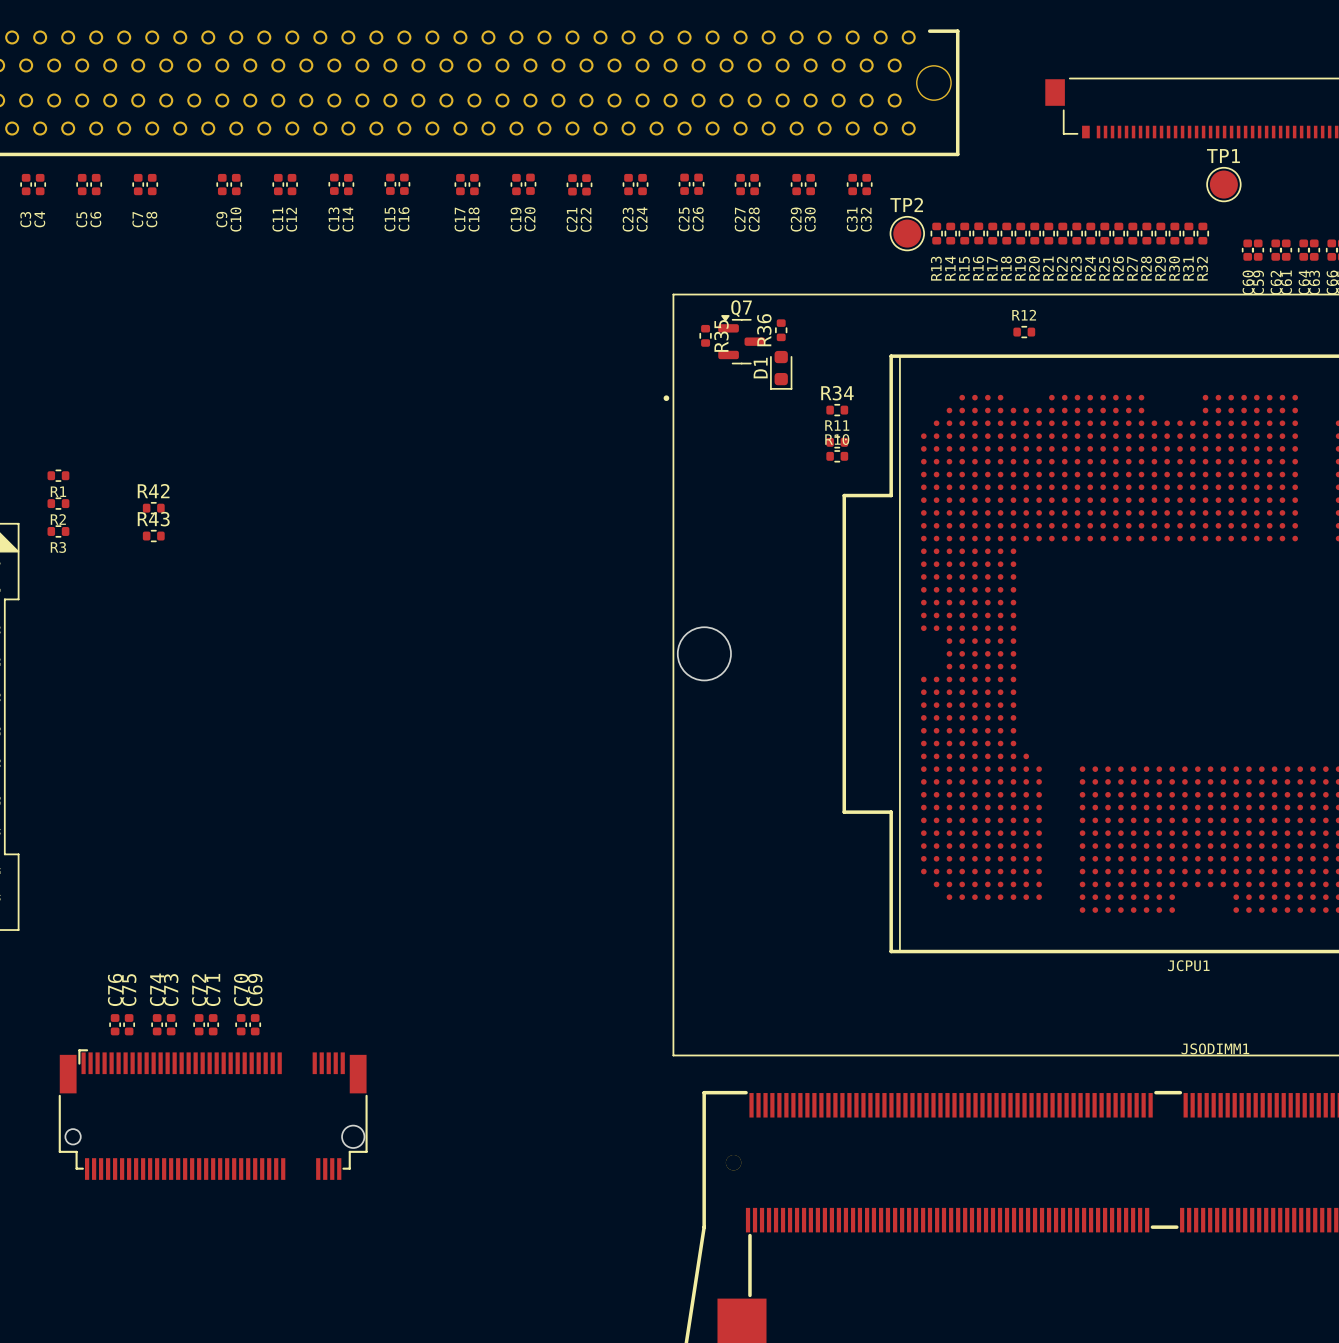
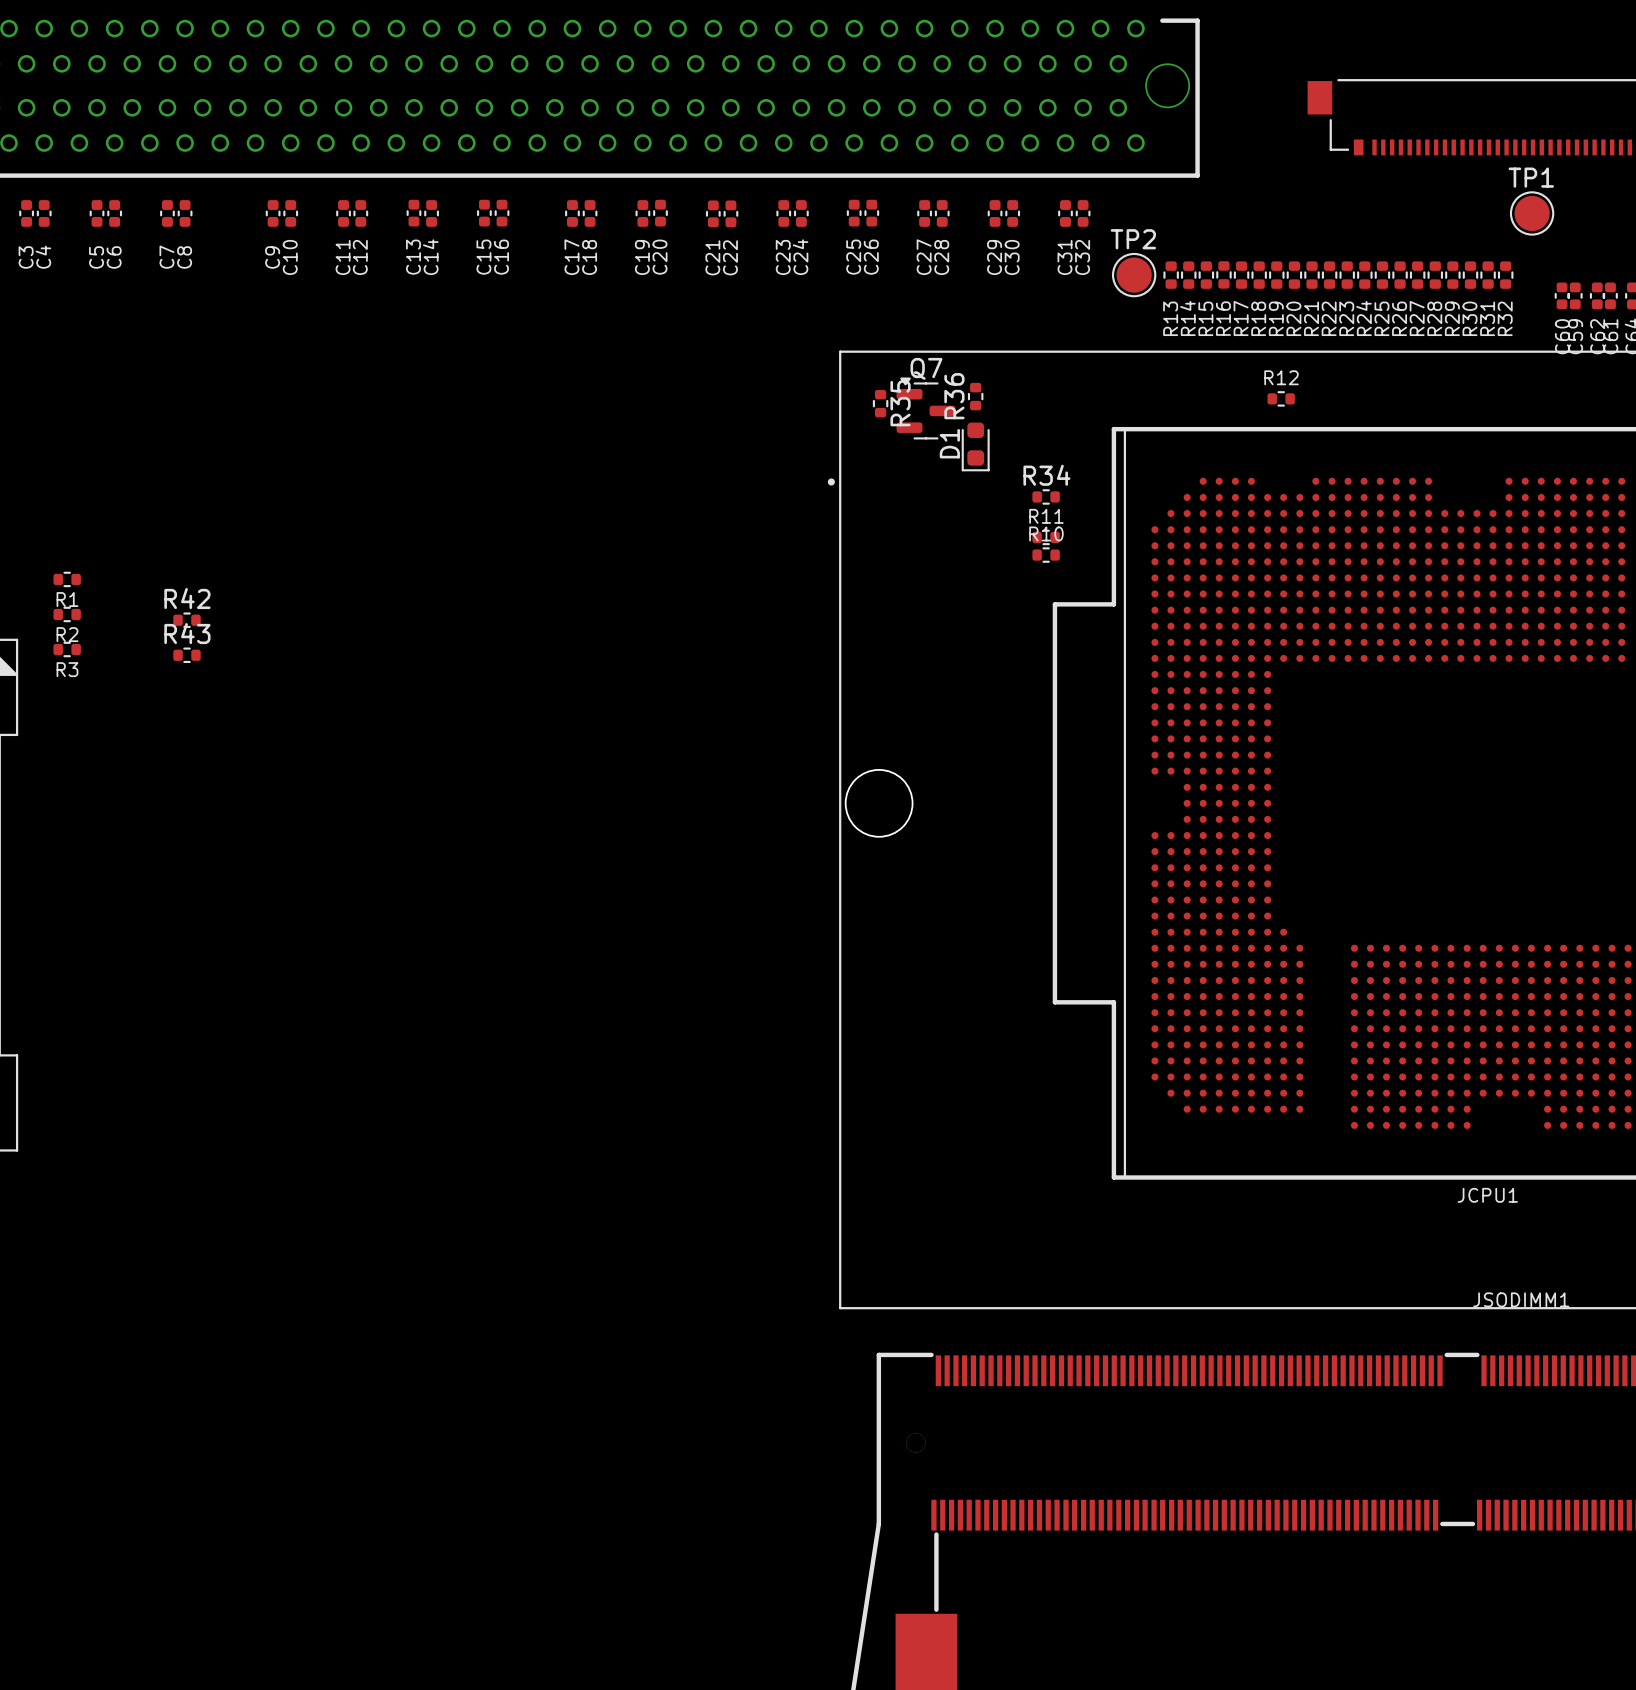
C76: (115, 1024) -> none
C75: (129, 1024) -> none
C74: (157, 1024) -> none
C73: (171, 1024) -> none
C72: (199, 1024) -> none
C71: (213, 1024) -> none
C70: (241, 1024) -> none
C69: (255, 1024) -> none
part: (213, 1114) -> none

